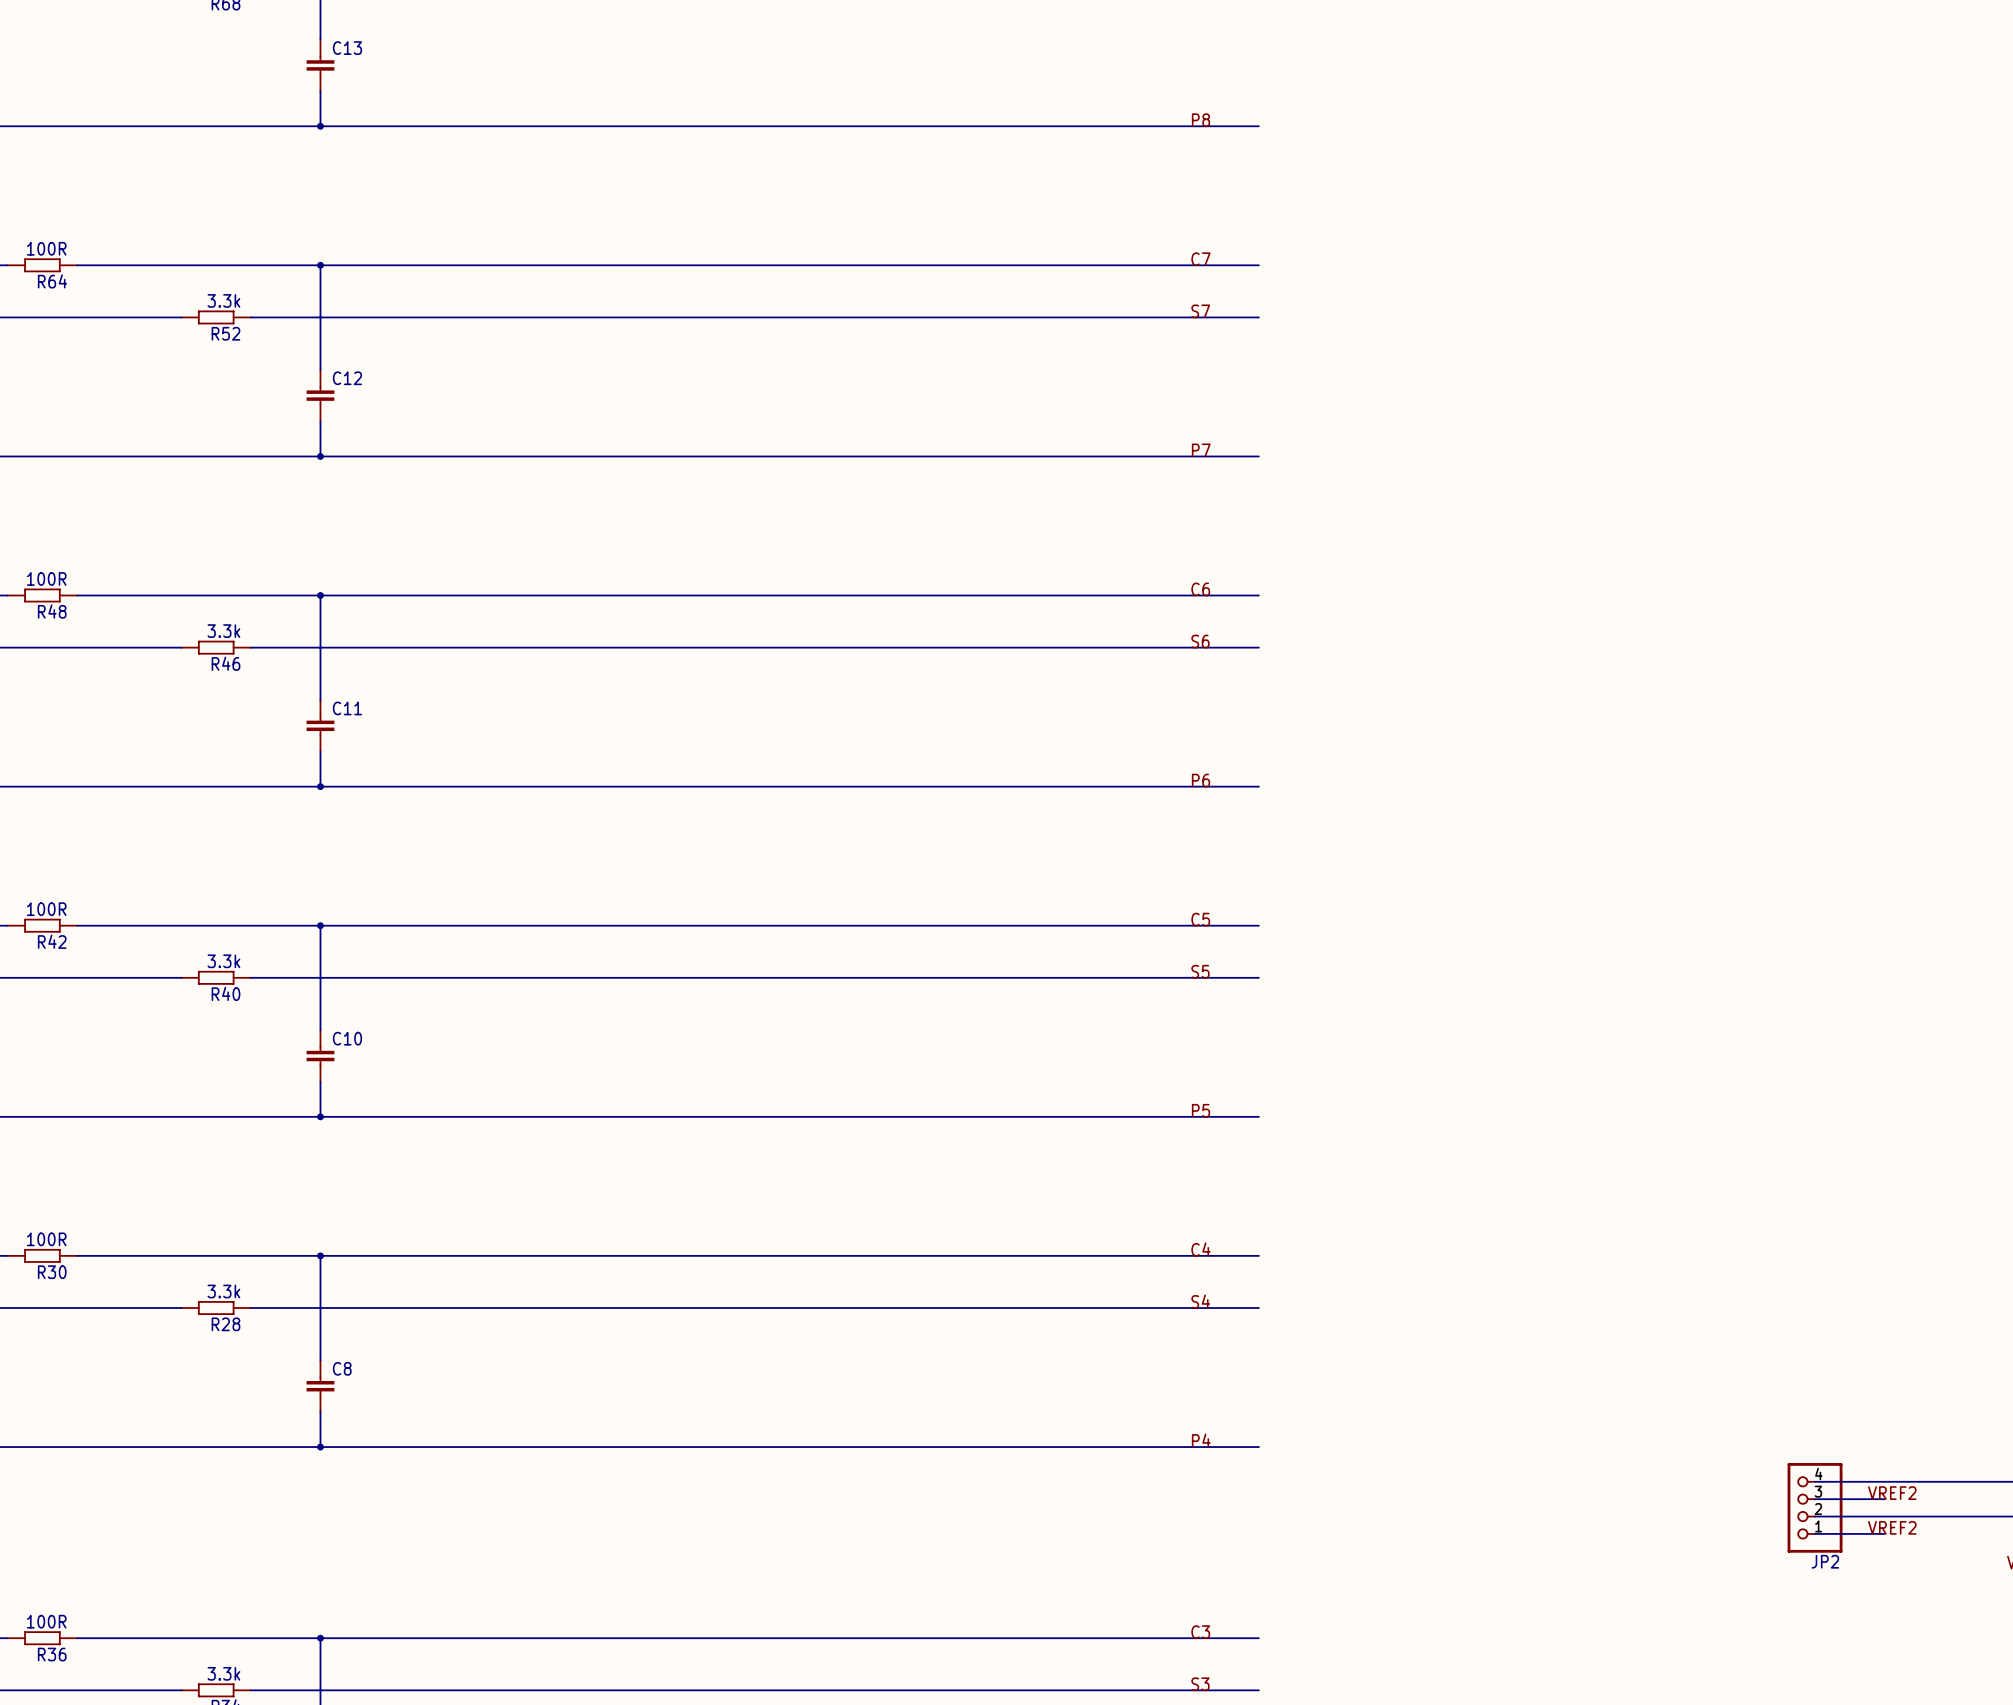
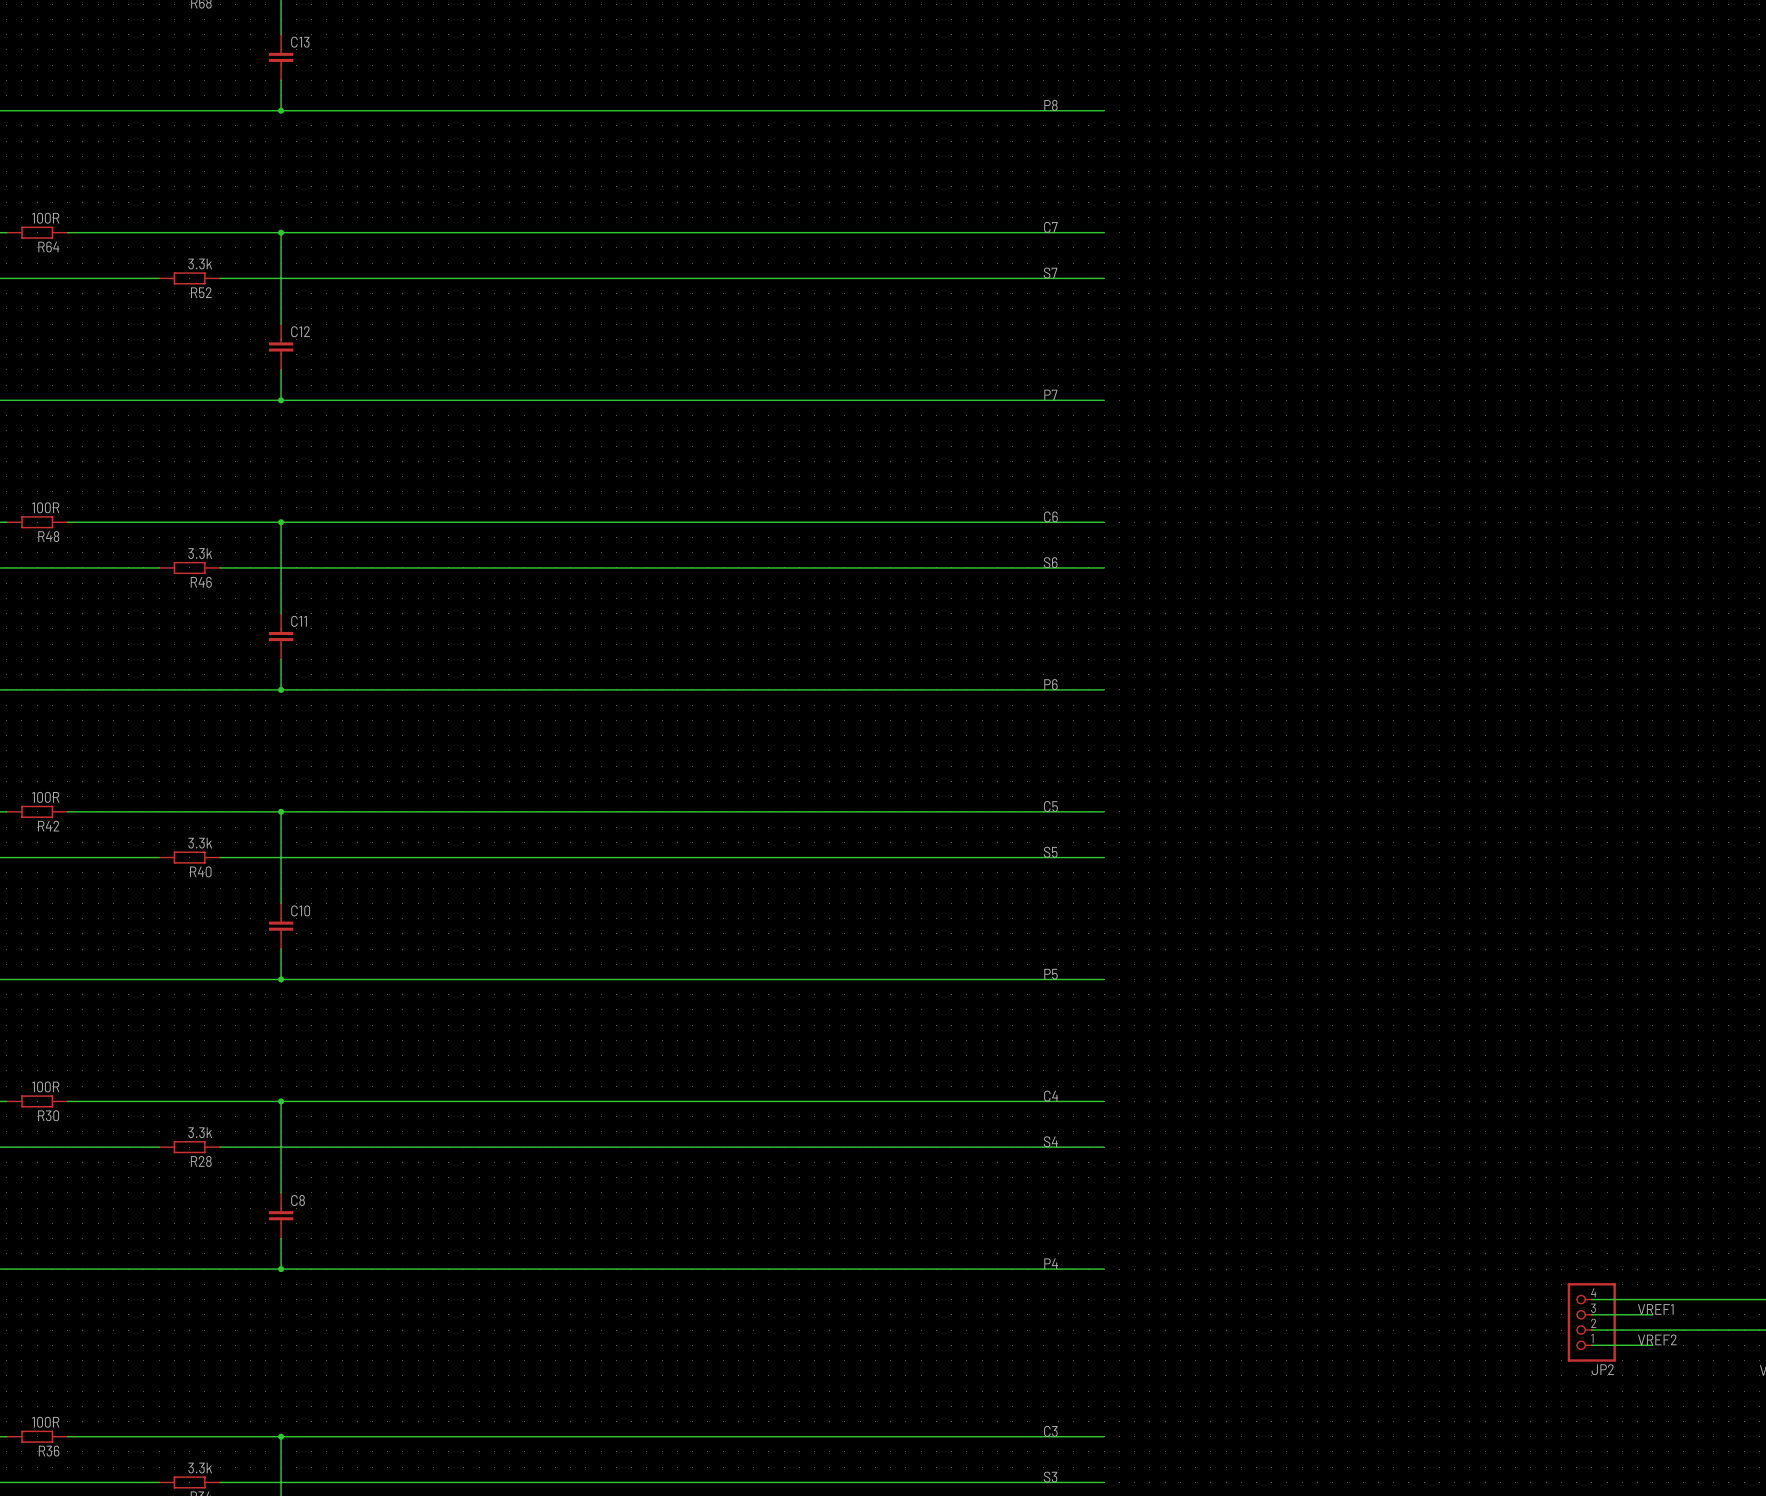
label: VREF2 (1892, 1493) -> VREF1 (1655, 1309)

